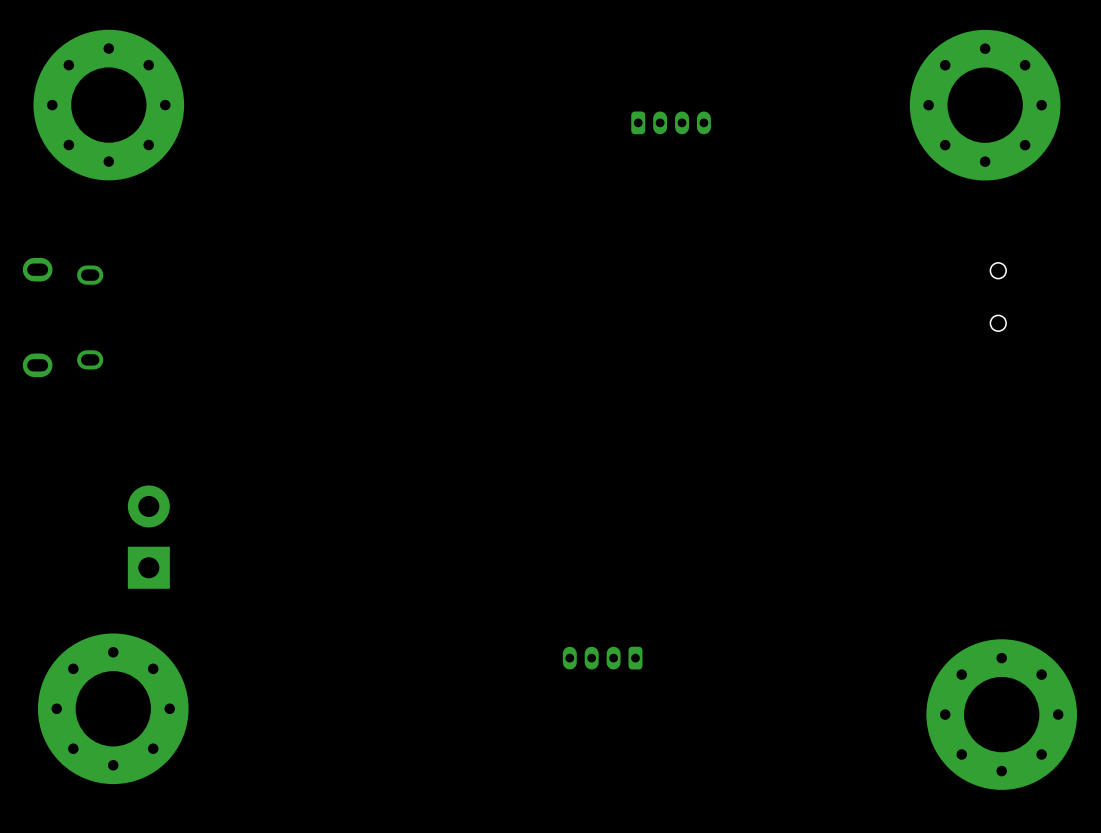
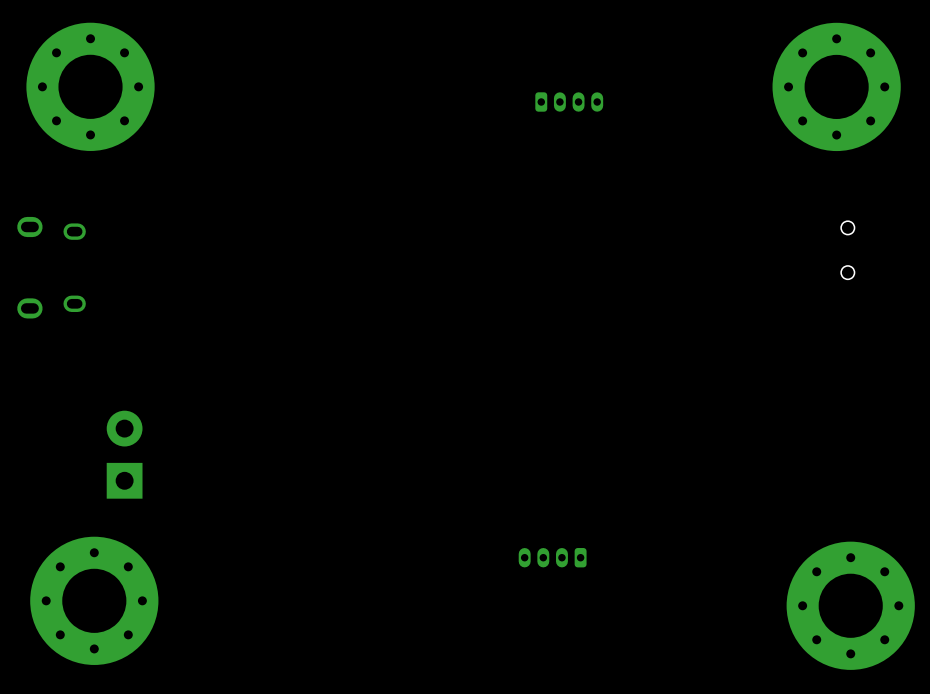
part position: (602, 658) -> (552, 557)

